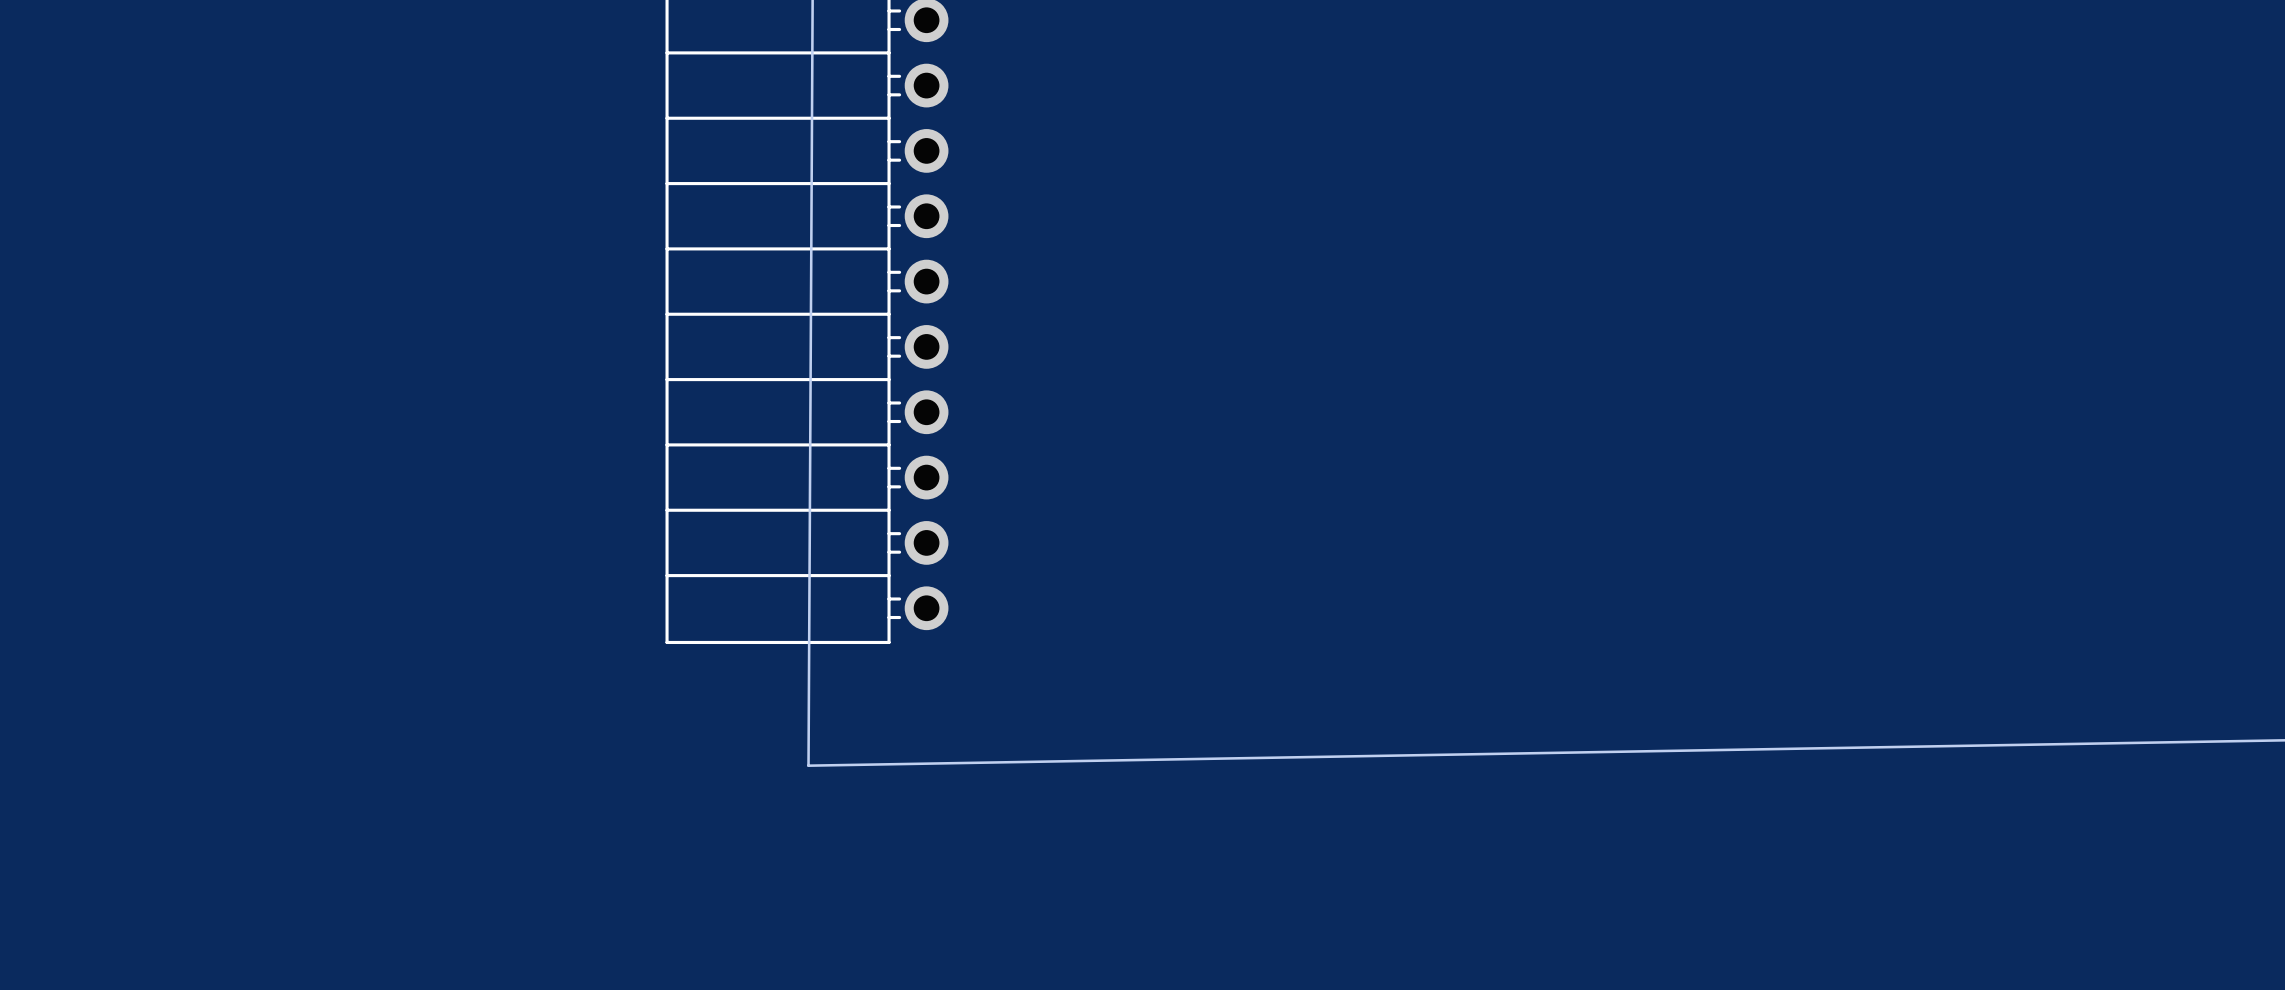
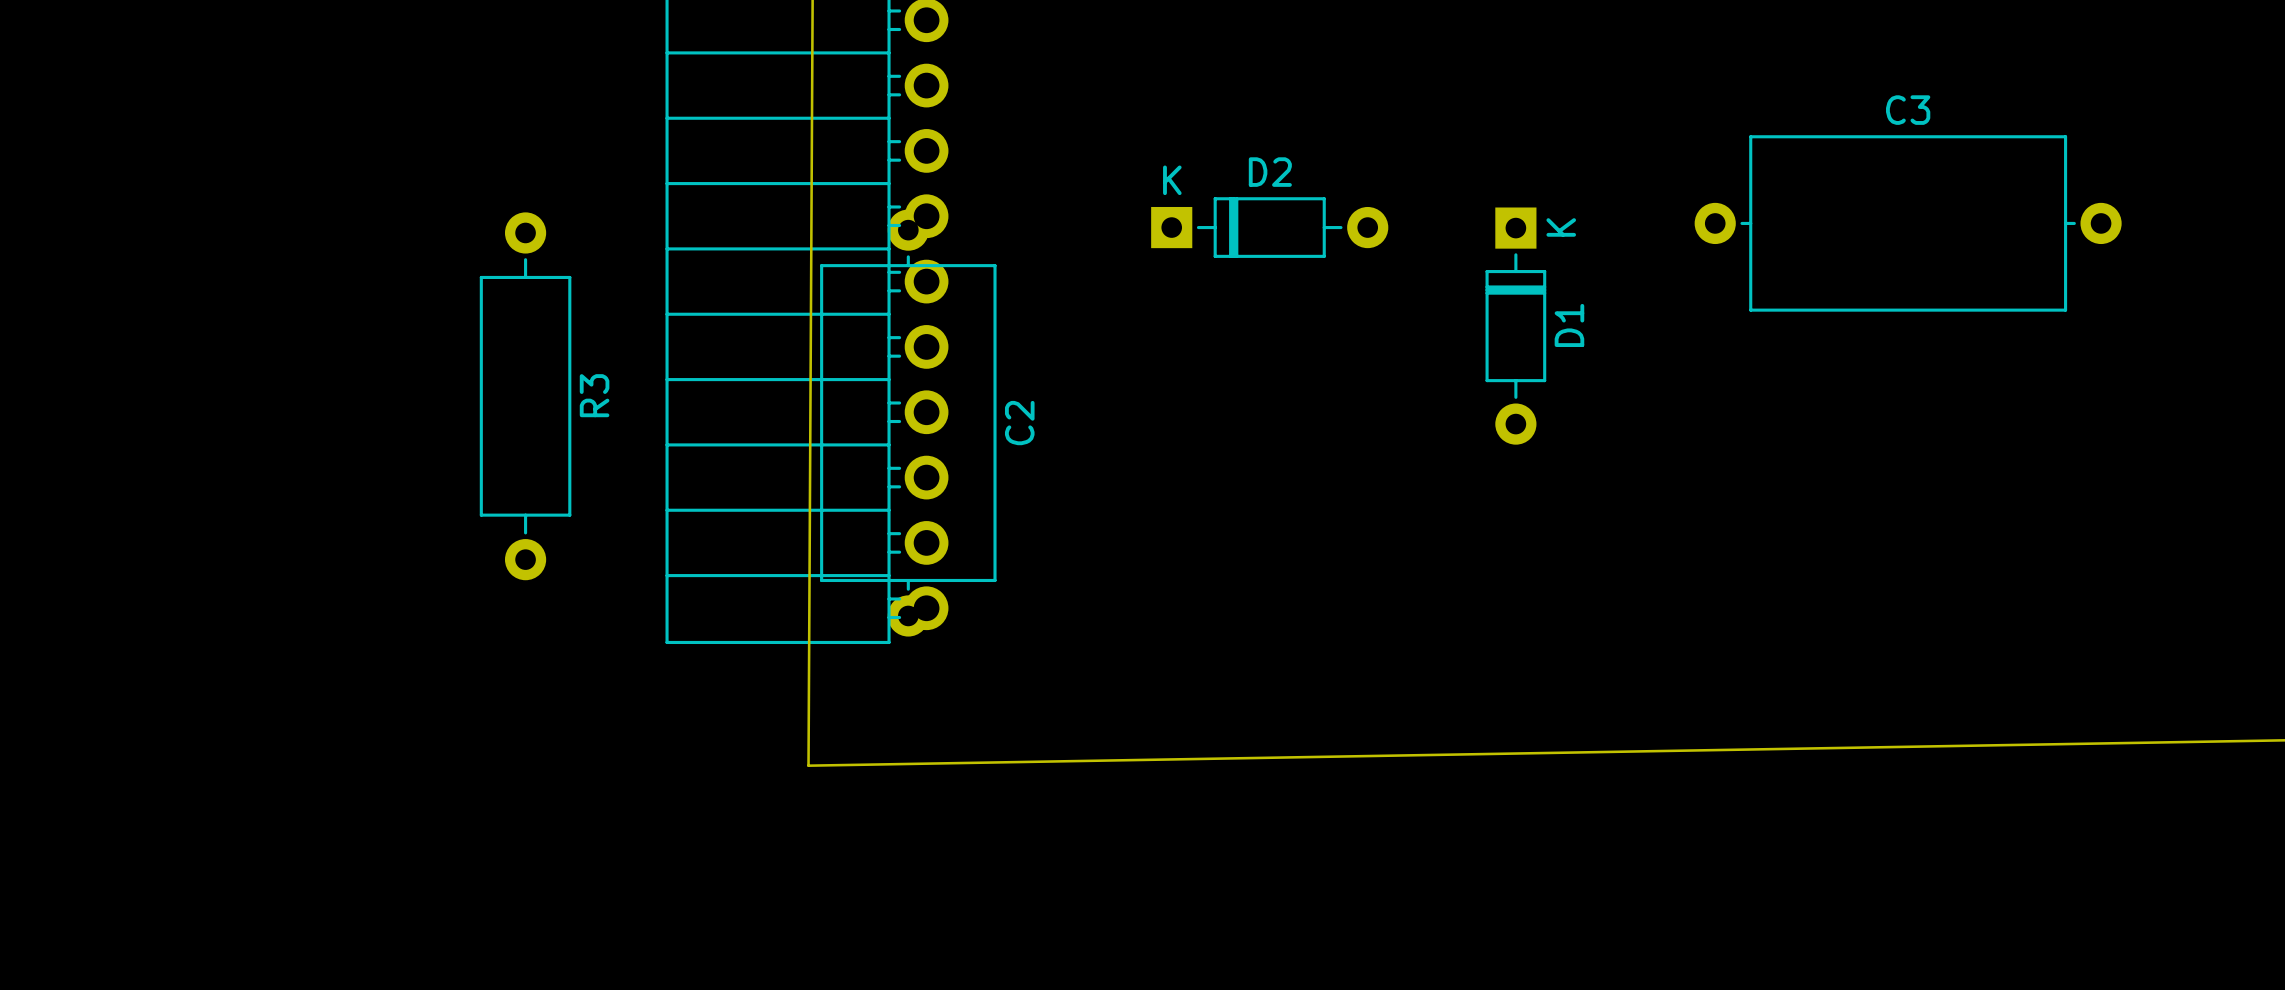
C3: none -> (1908, 223)
D2: none -> (1269, 227)
D1: none -> (1515, 326)
R3: none -> (525, 396)
C2: none -> (908, 423)

